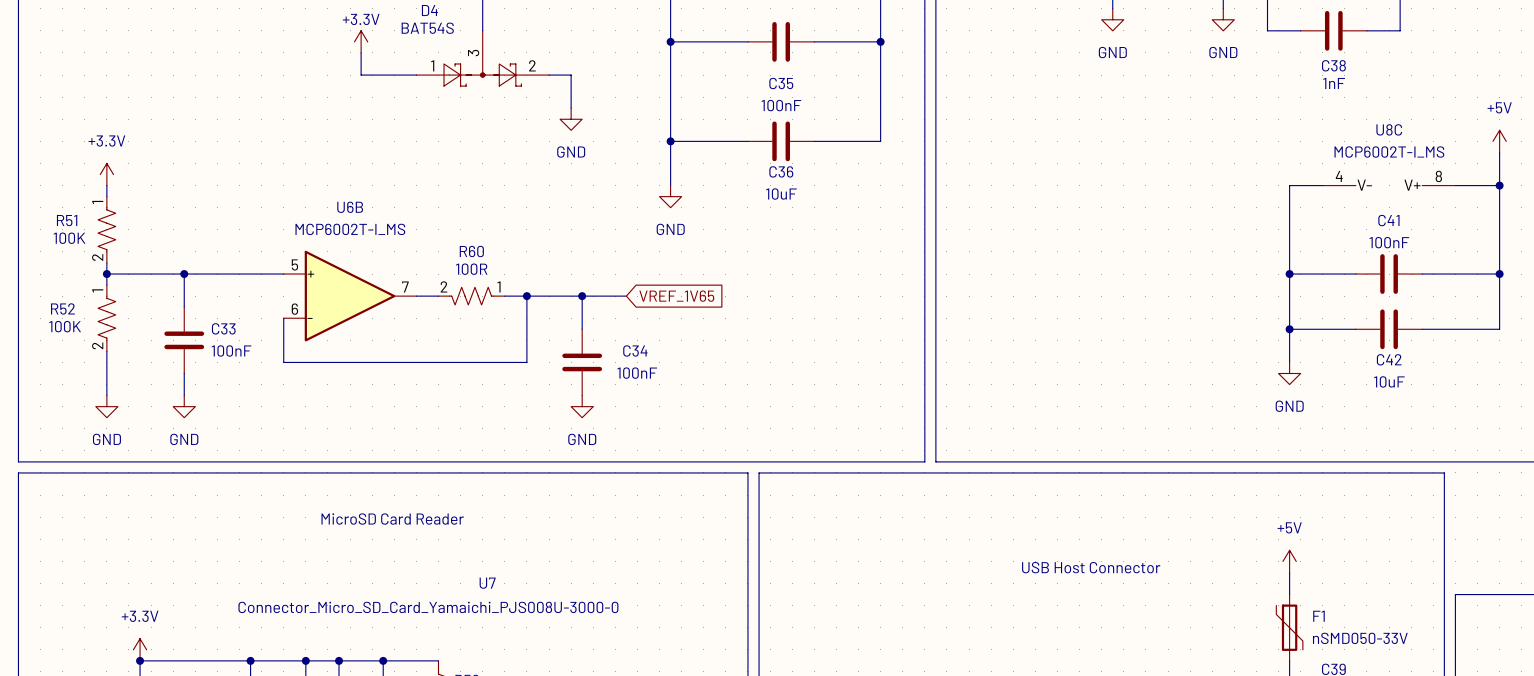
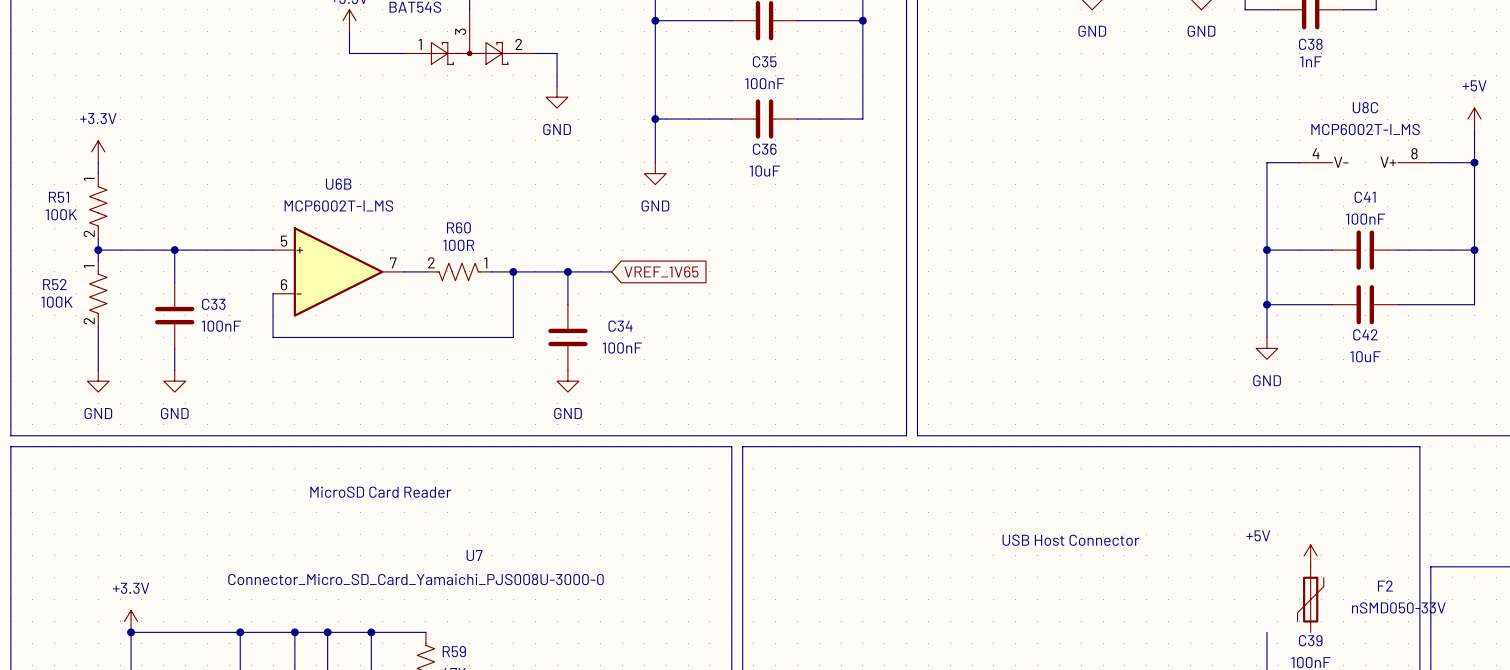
power symbol text position: +5V (1289, 527) -> +5V (1258, 535)
power symbol position: +5V (1289, 561) -> +5V (1310, 555)
wire: (1289, 572) (1289, 594) -> none
F1: nSMD050-33V (1289, 627) -> none
F2: none -> nSMD050-33V (1310, 599)

